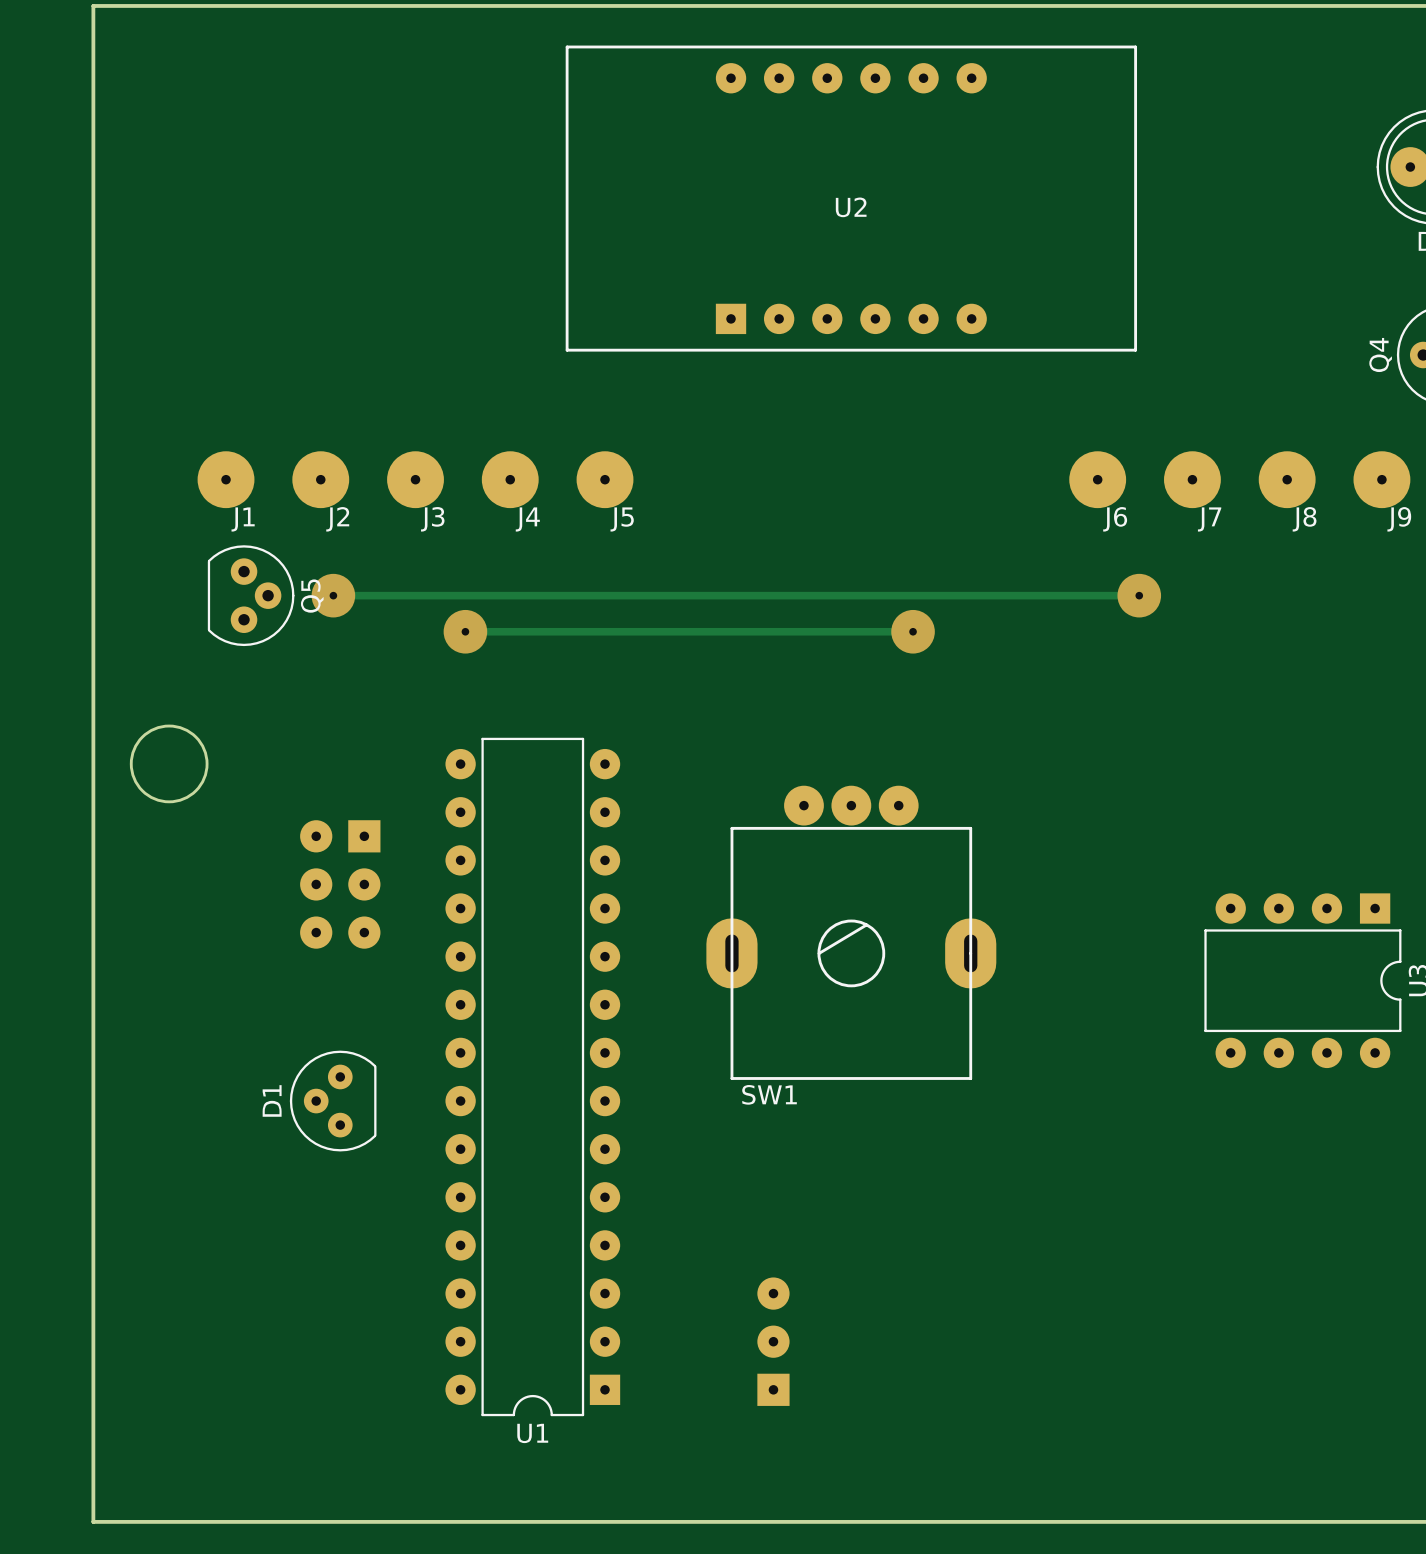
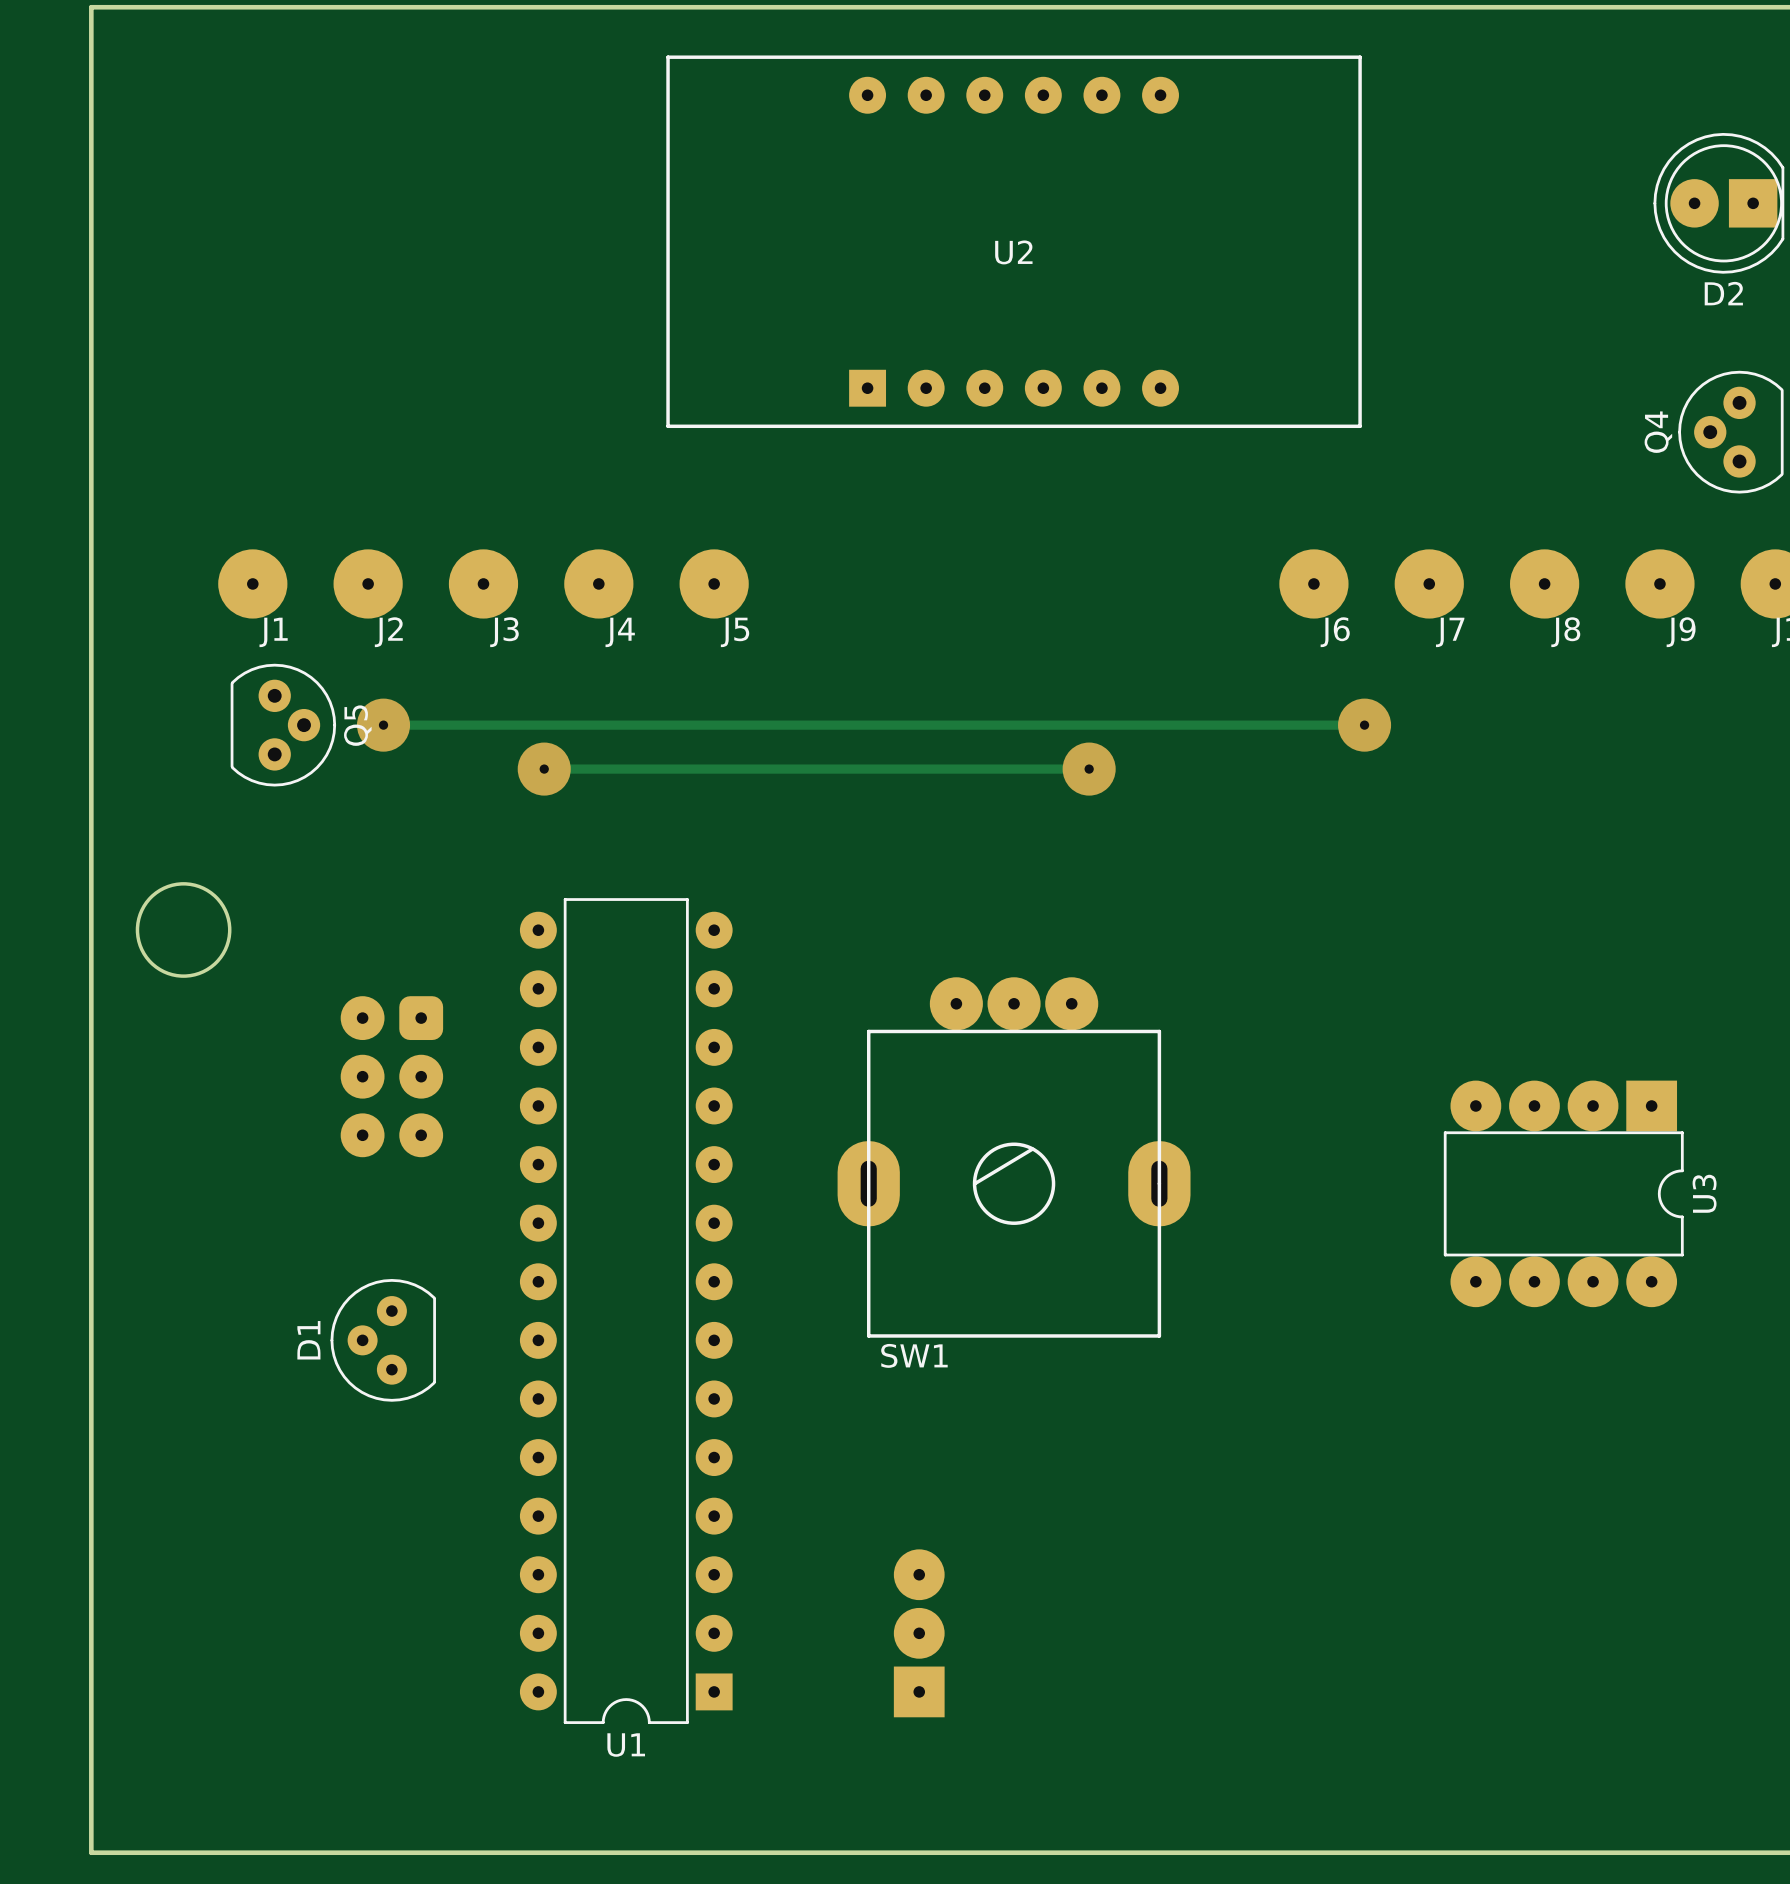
SW1 footprint: [706, 785, 997, 1080] -> [837, 977, 1191, 1338]
part footprint: [300, 820, 381, 949] -> [340, 996, 444, 1158]
U3 footprint: [1204, 893, 1402, 1069] -> [1443, 1080, 1684, 1308]
part footprint: [757, 1277, 790, 1406] -> [893, 1549, 945, 1718]

